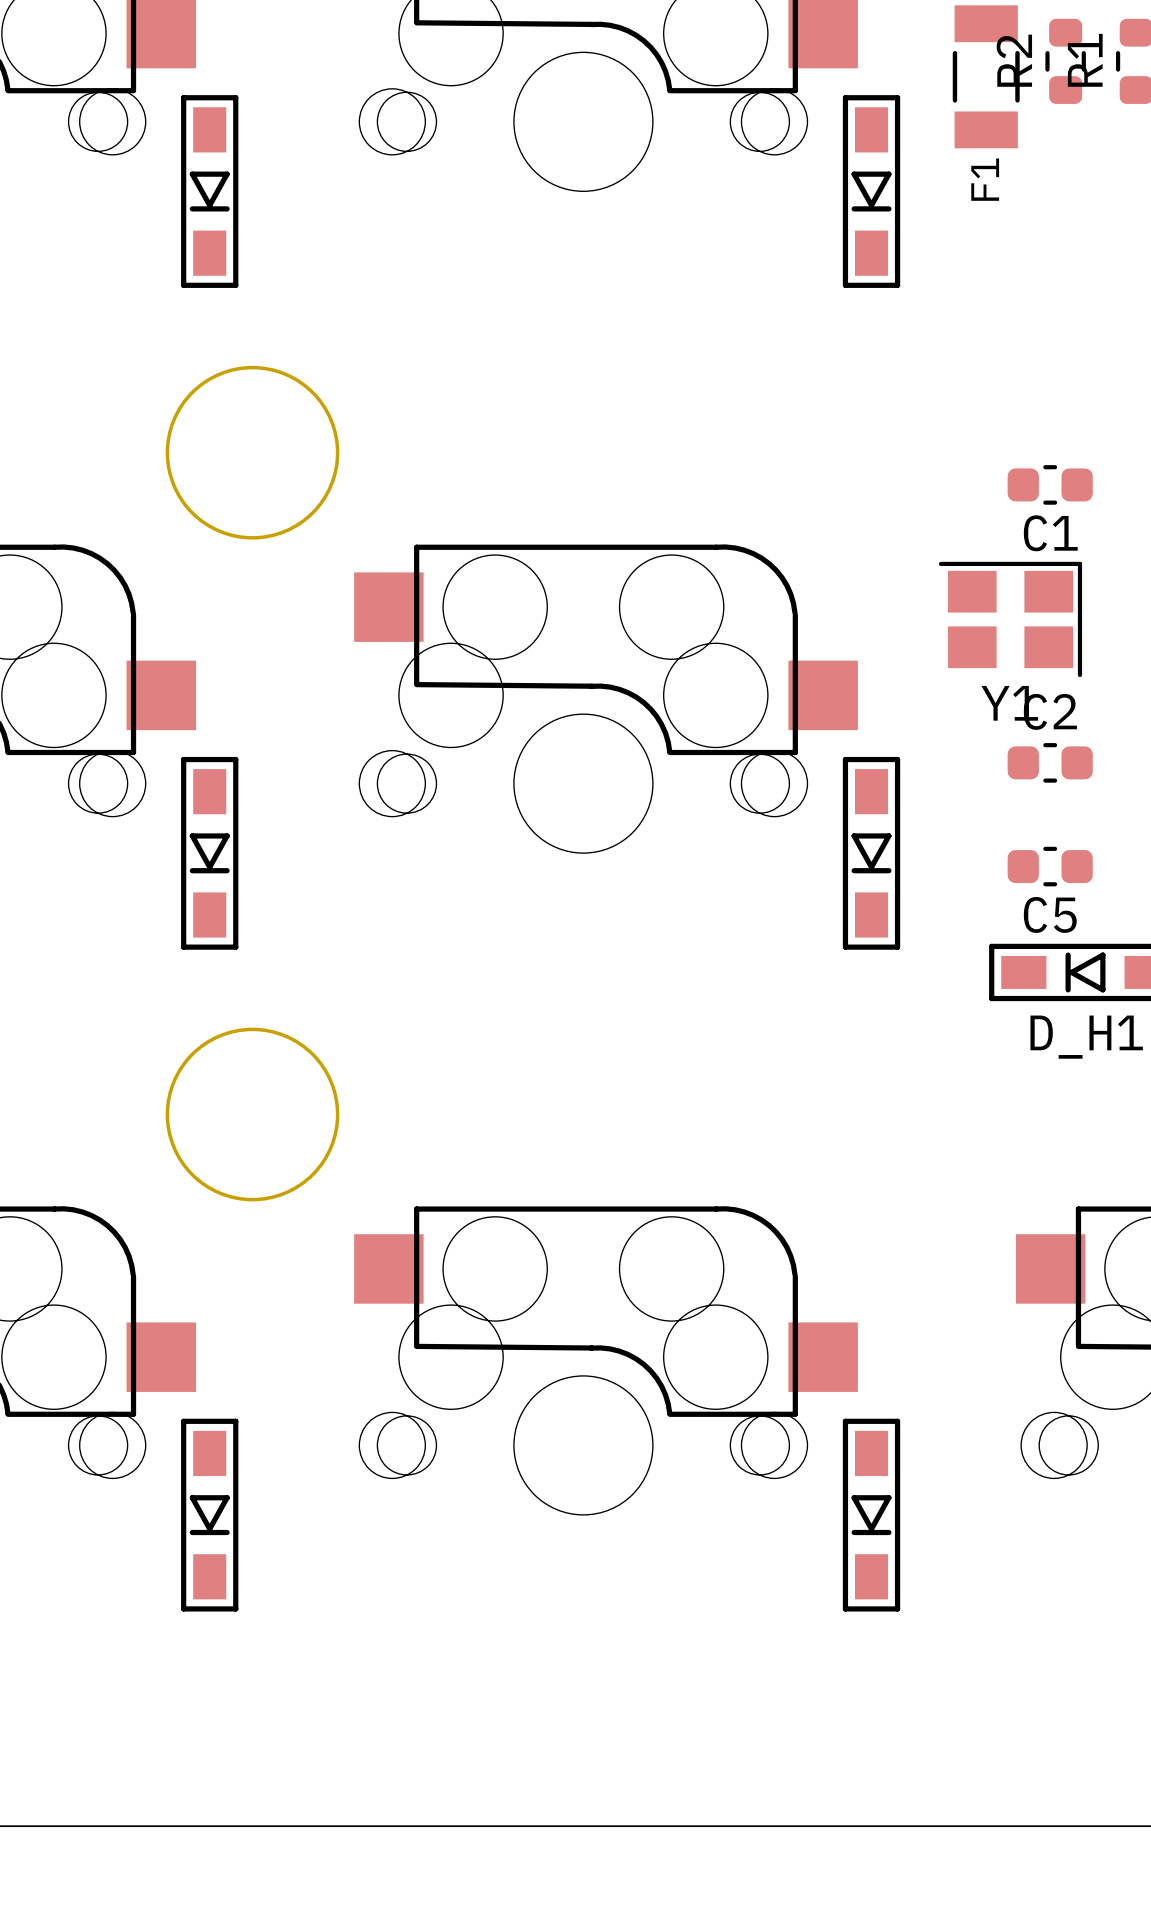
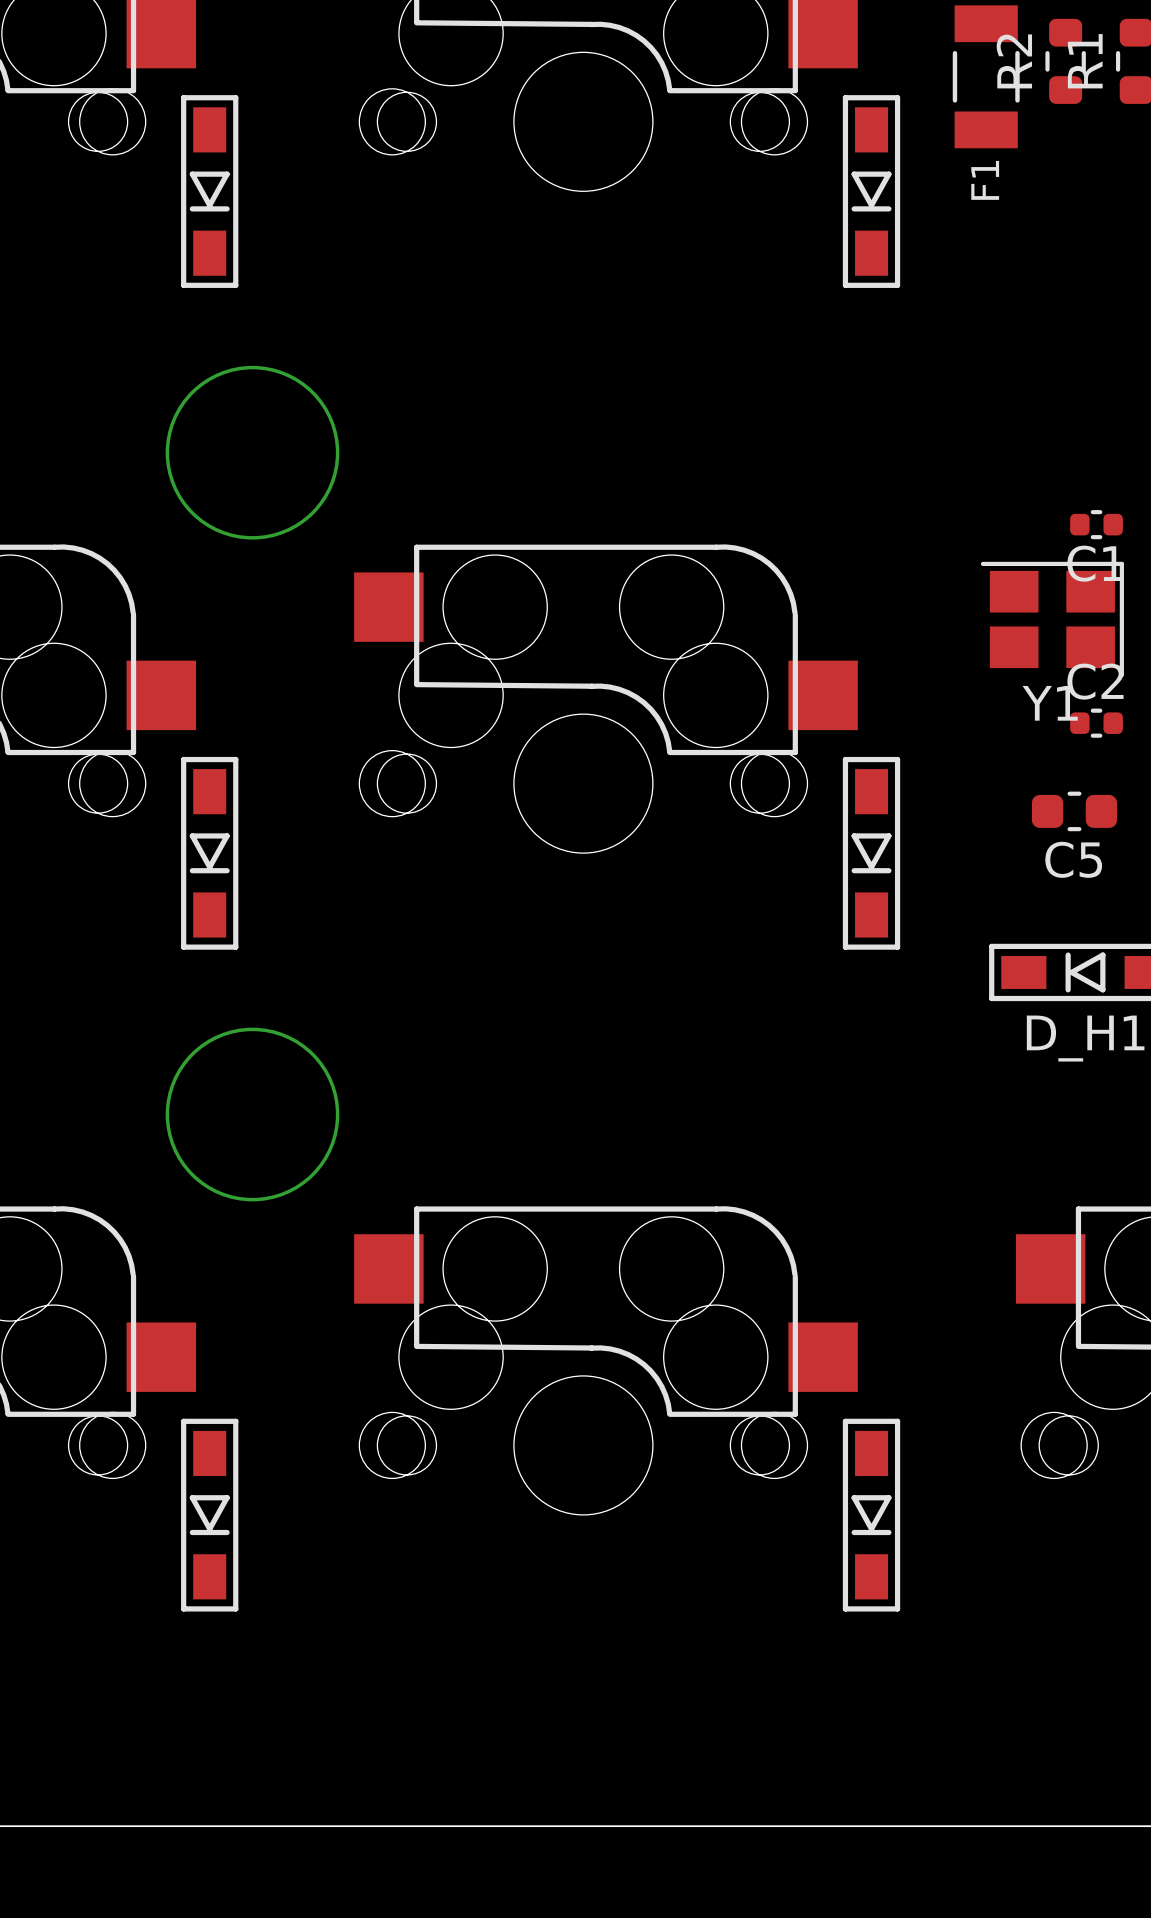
C1 footprint: [1007, 465, 1093, 505] -> [1070, 510, 1123, 540]
Y1 position: (1010, 619) -> (1052, 619)
C2 footprint: [1007, 743, 1093, 783] -> [1070, 708, 1123, 738]
C5 position: (1050, 866) -> (1074, 811)

